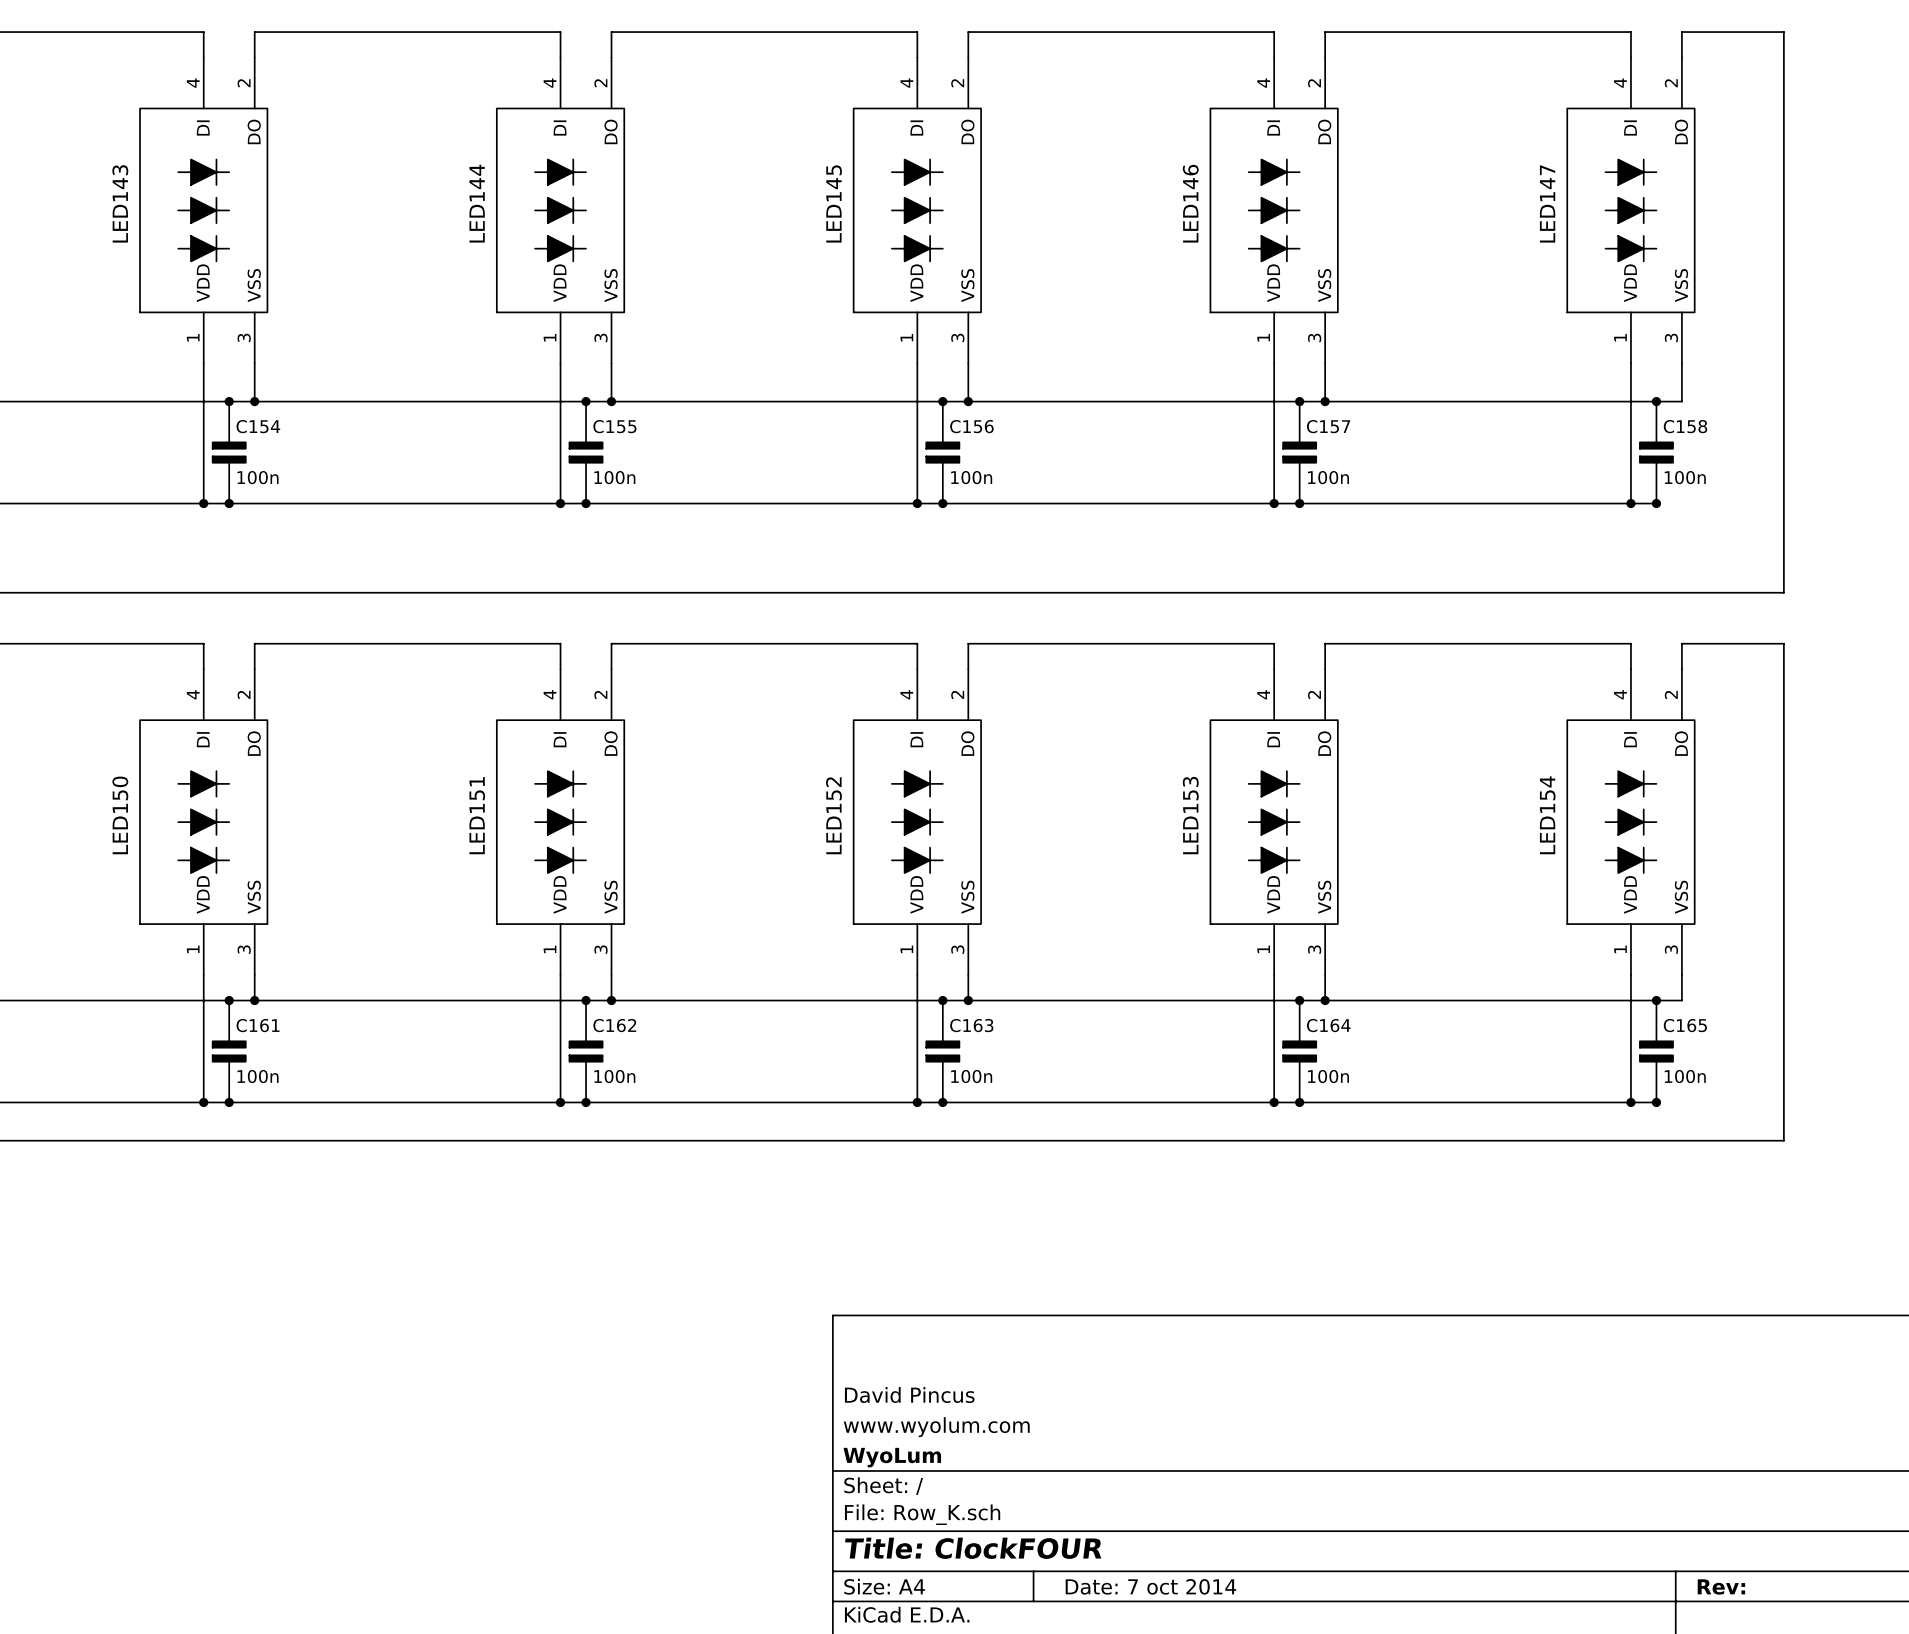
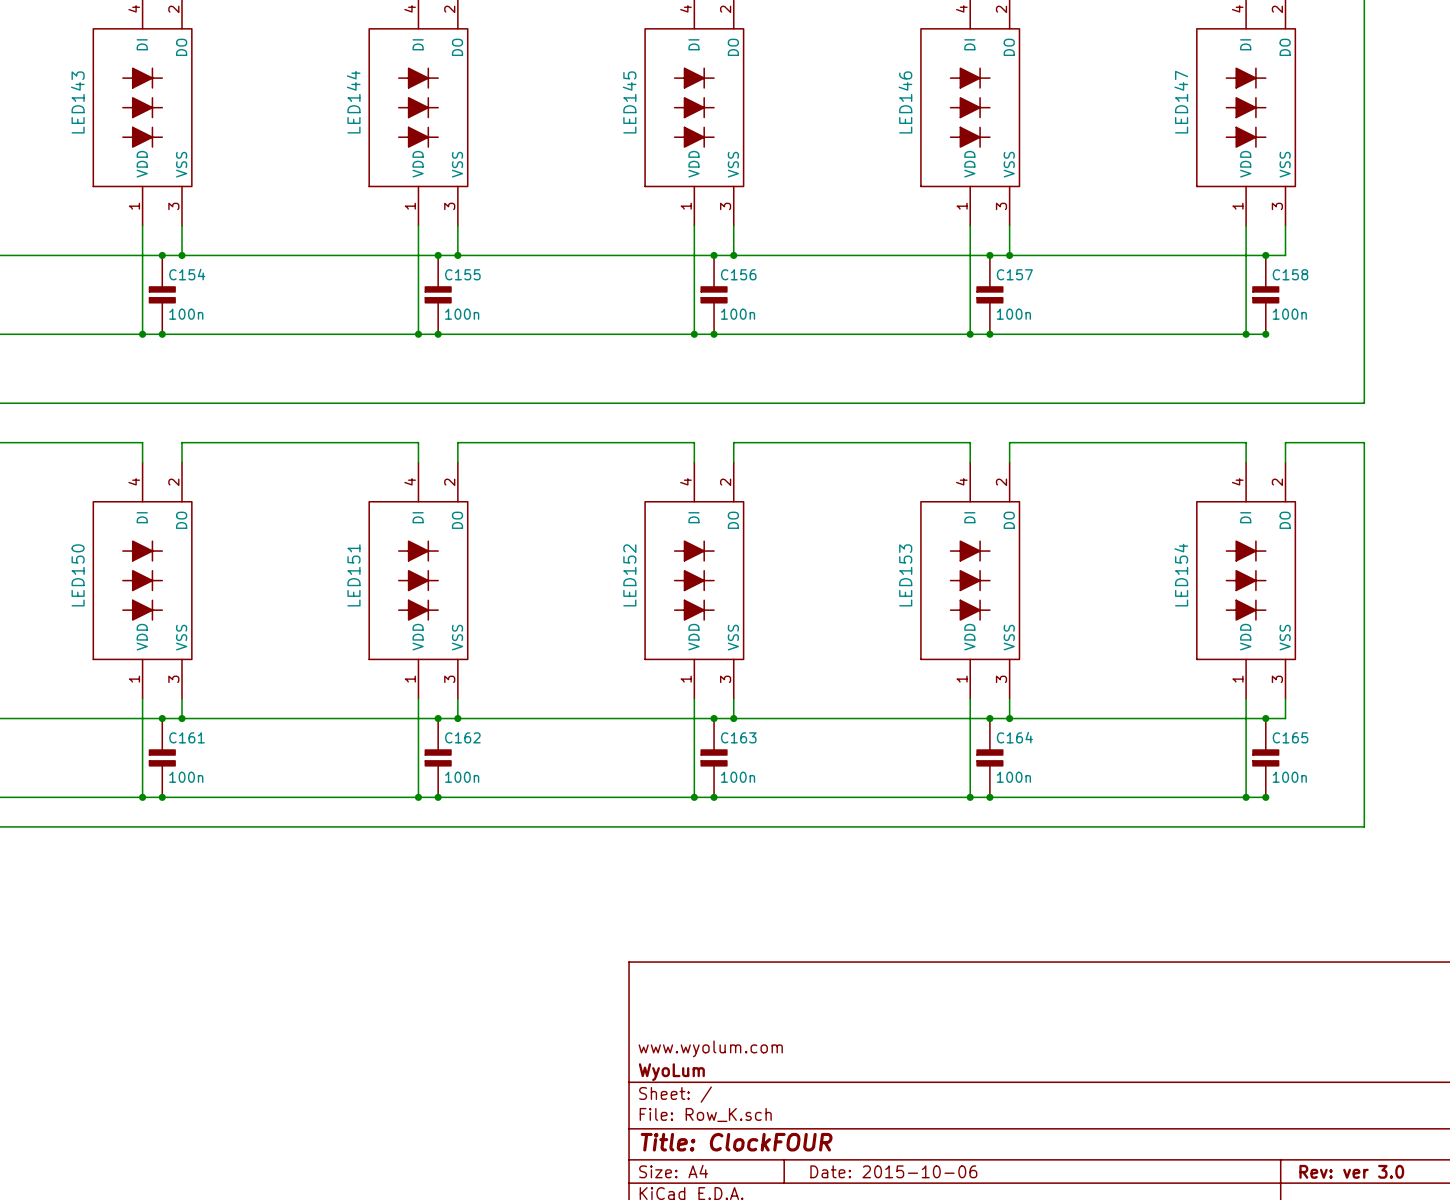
title block: David Pincus (909, 1395) -> none
title block: Date: 7 oct 2014 (1150, 1586) -> Date: 2015-10-06 (893, 1171)
title block: Rev: (1721, 1586) -> Rev: ver 3.0 (1351, 1171)

